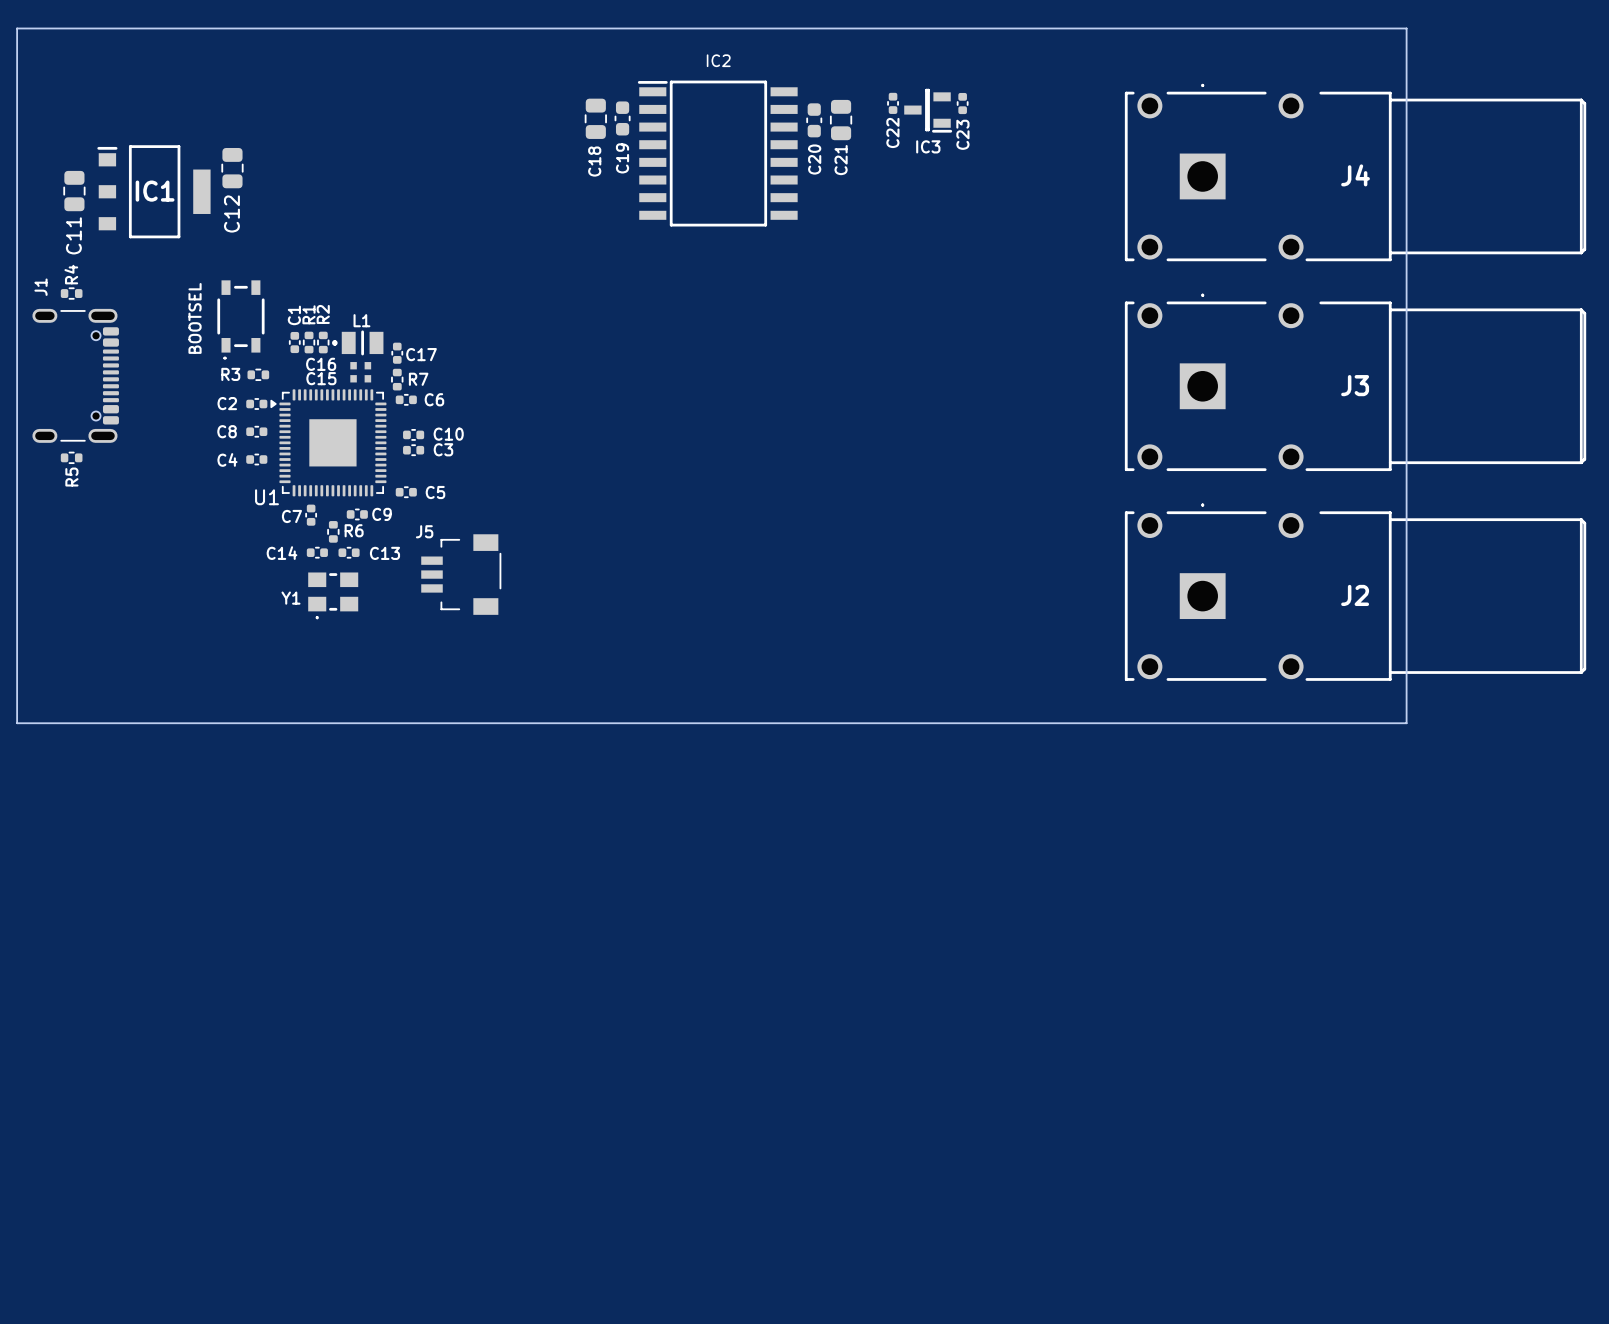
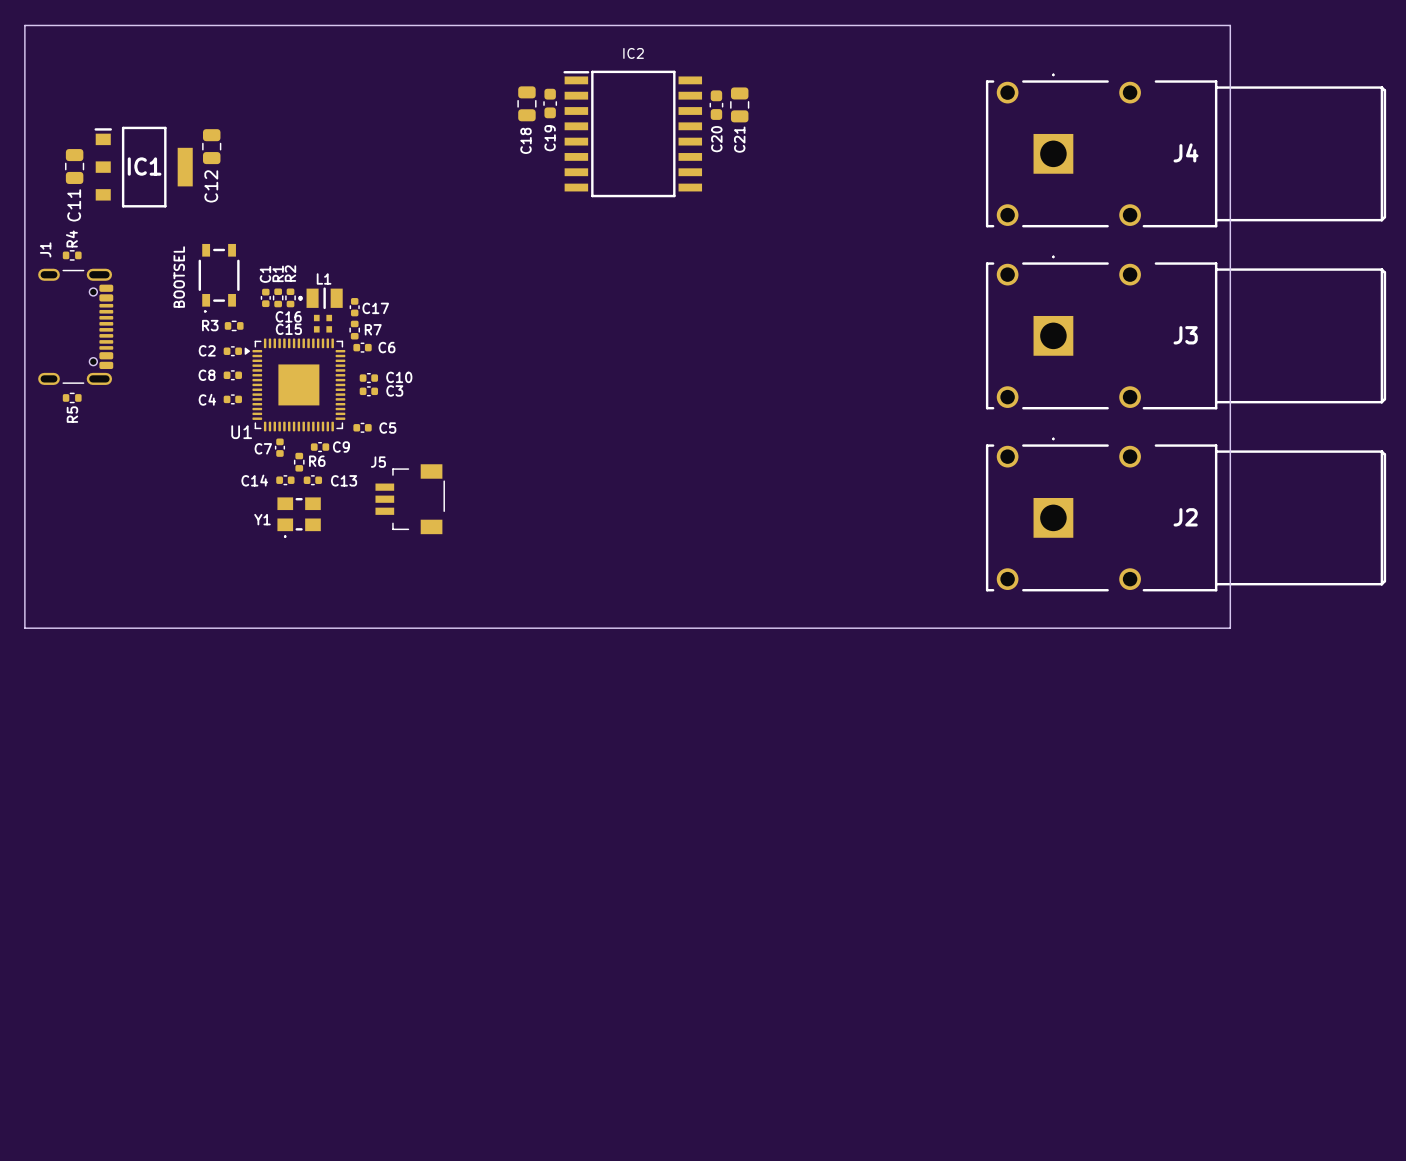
C22: (893, 103) -> none
C23: (962, 103) -> none
IC3: (928, 110) -> none

